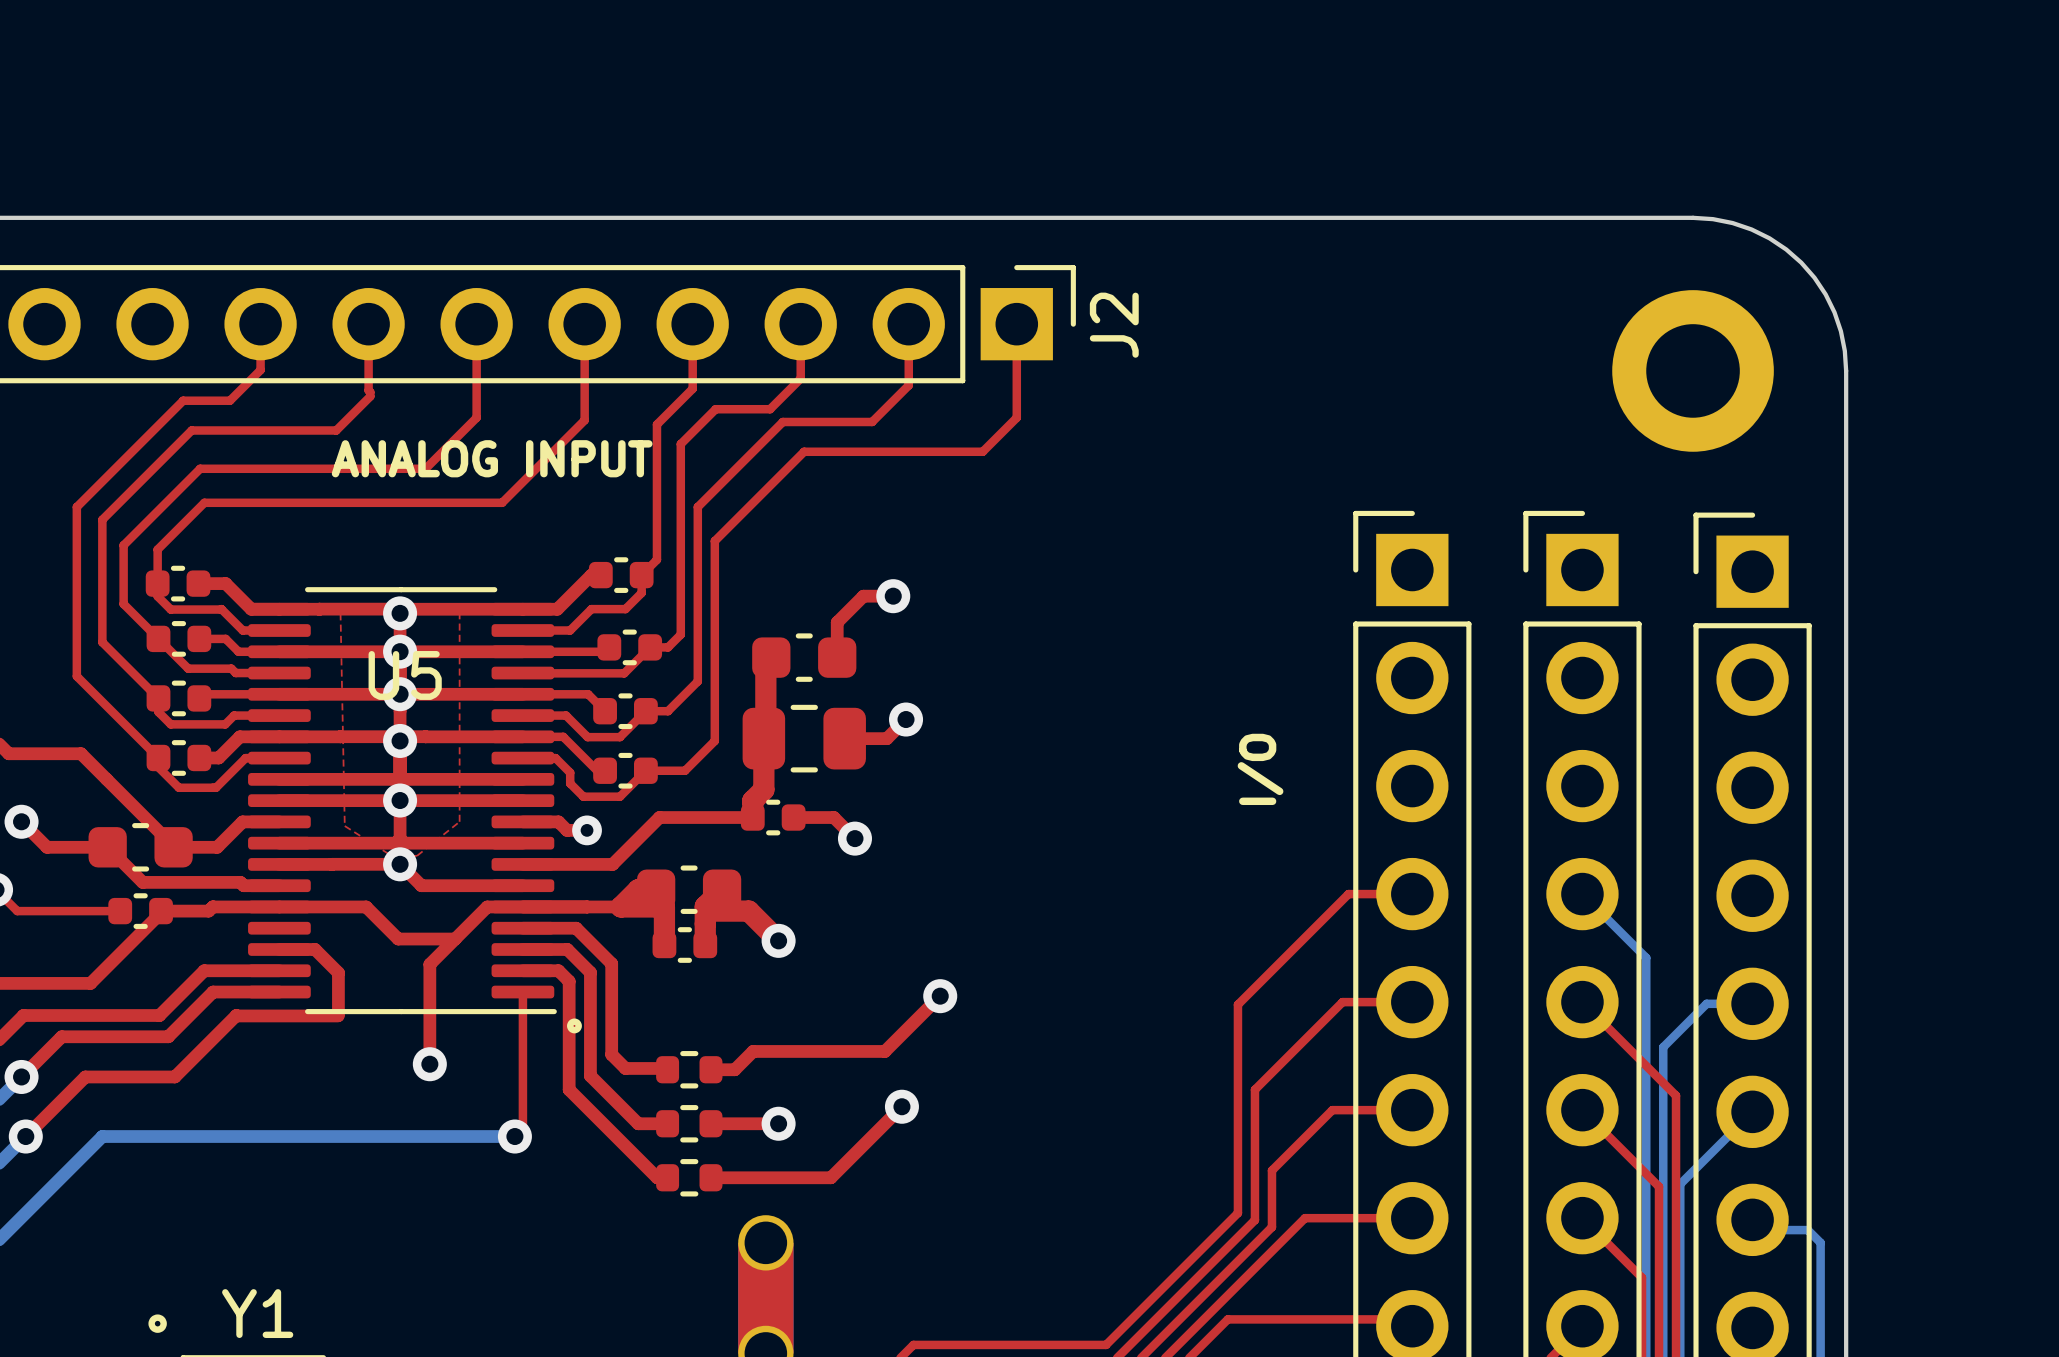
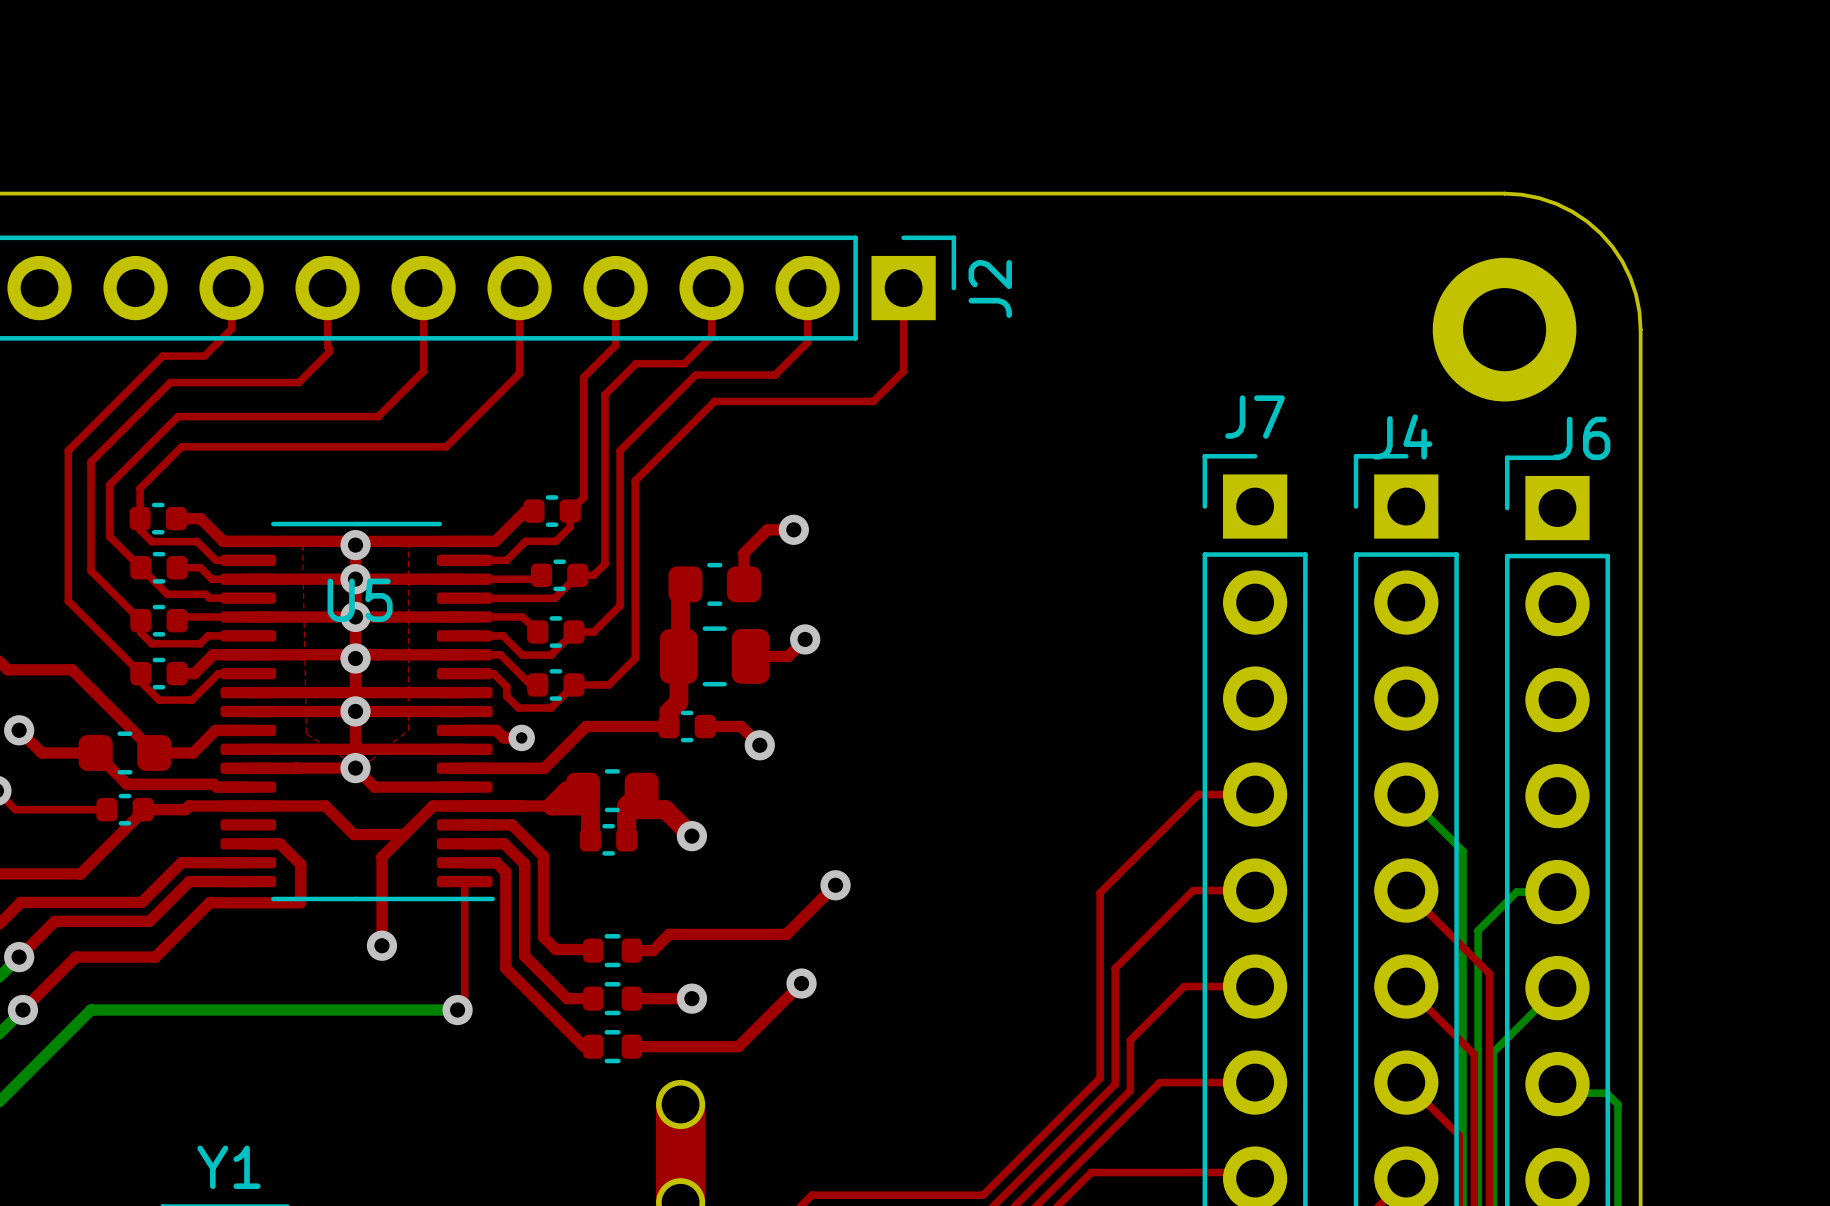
text: ANALOG INPUT (492, 458) -> none
J7 name: none -> J7 (1255, 417)
J4 name: none -> J4 (1402, 436)
text: none -> J6 (1581, 438)
text: I/O (1260, 769) -> none
drawing: [567, 1018, 582, 1034] -> none
drawing: [148, 1314, 167, 1333] -> none

